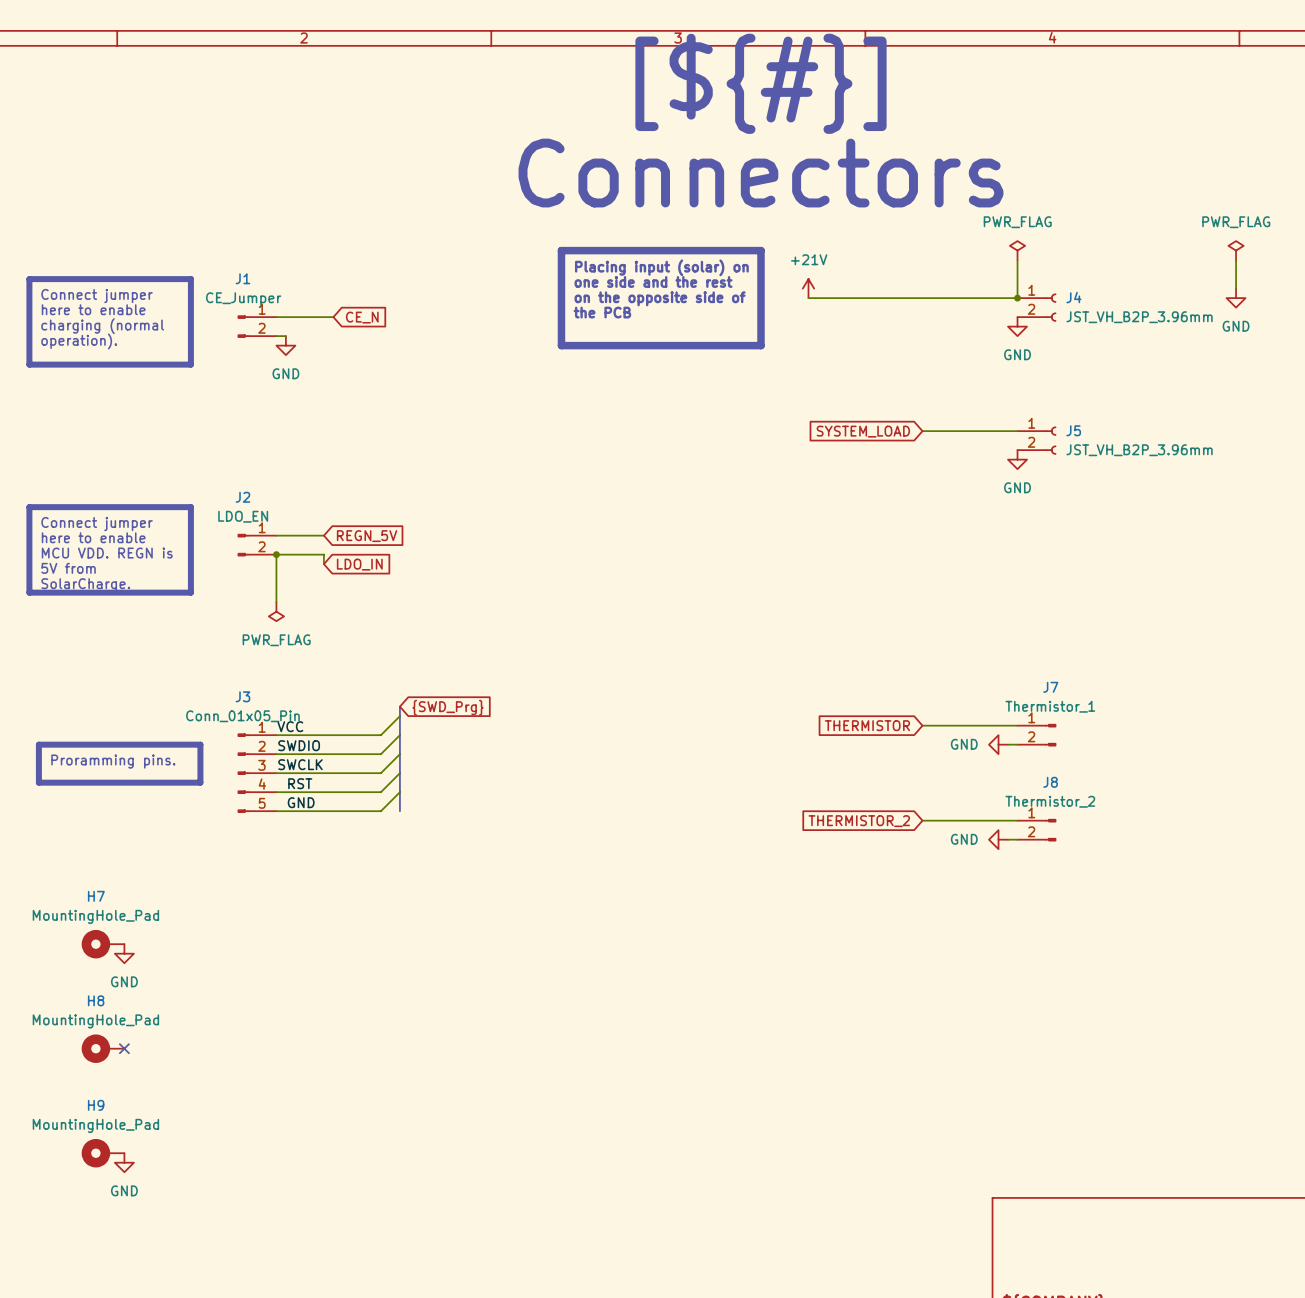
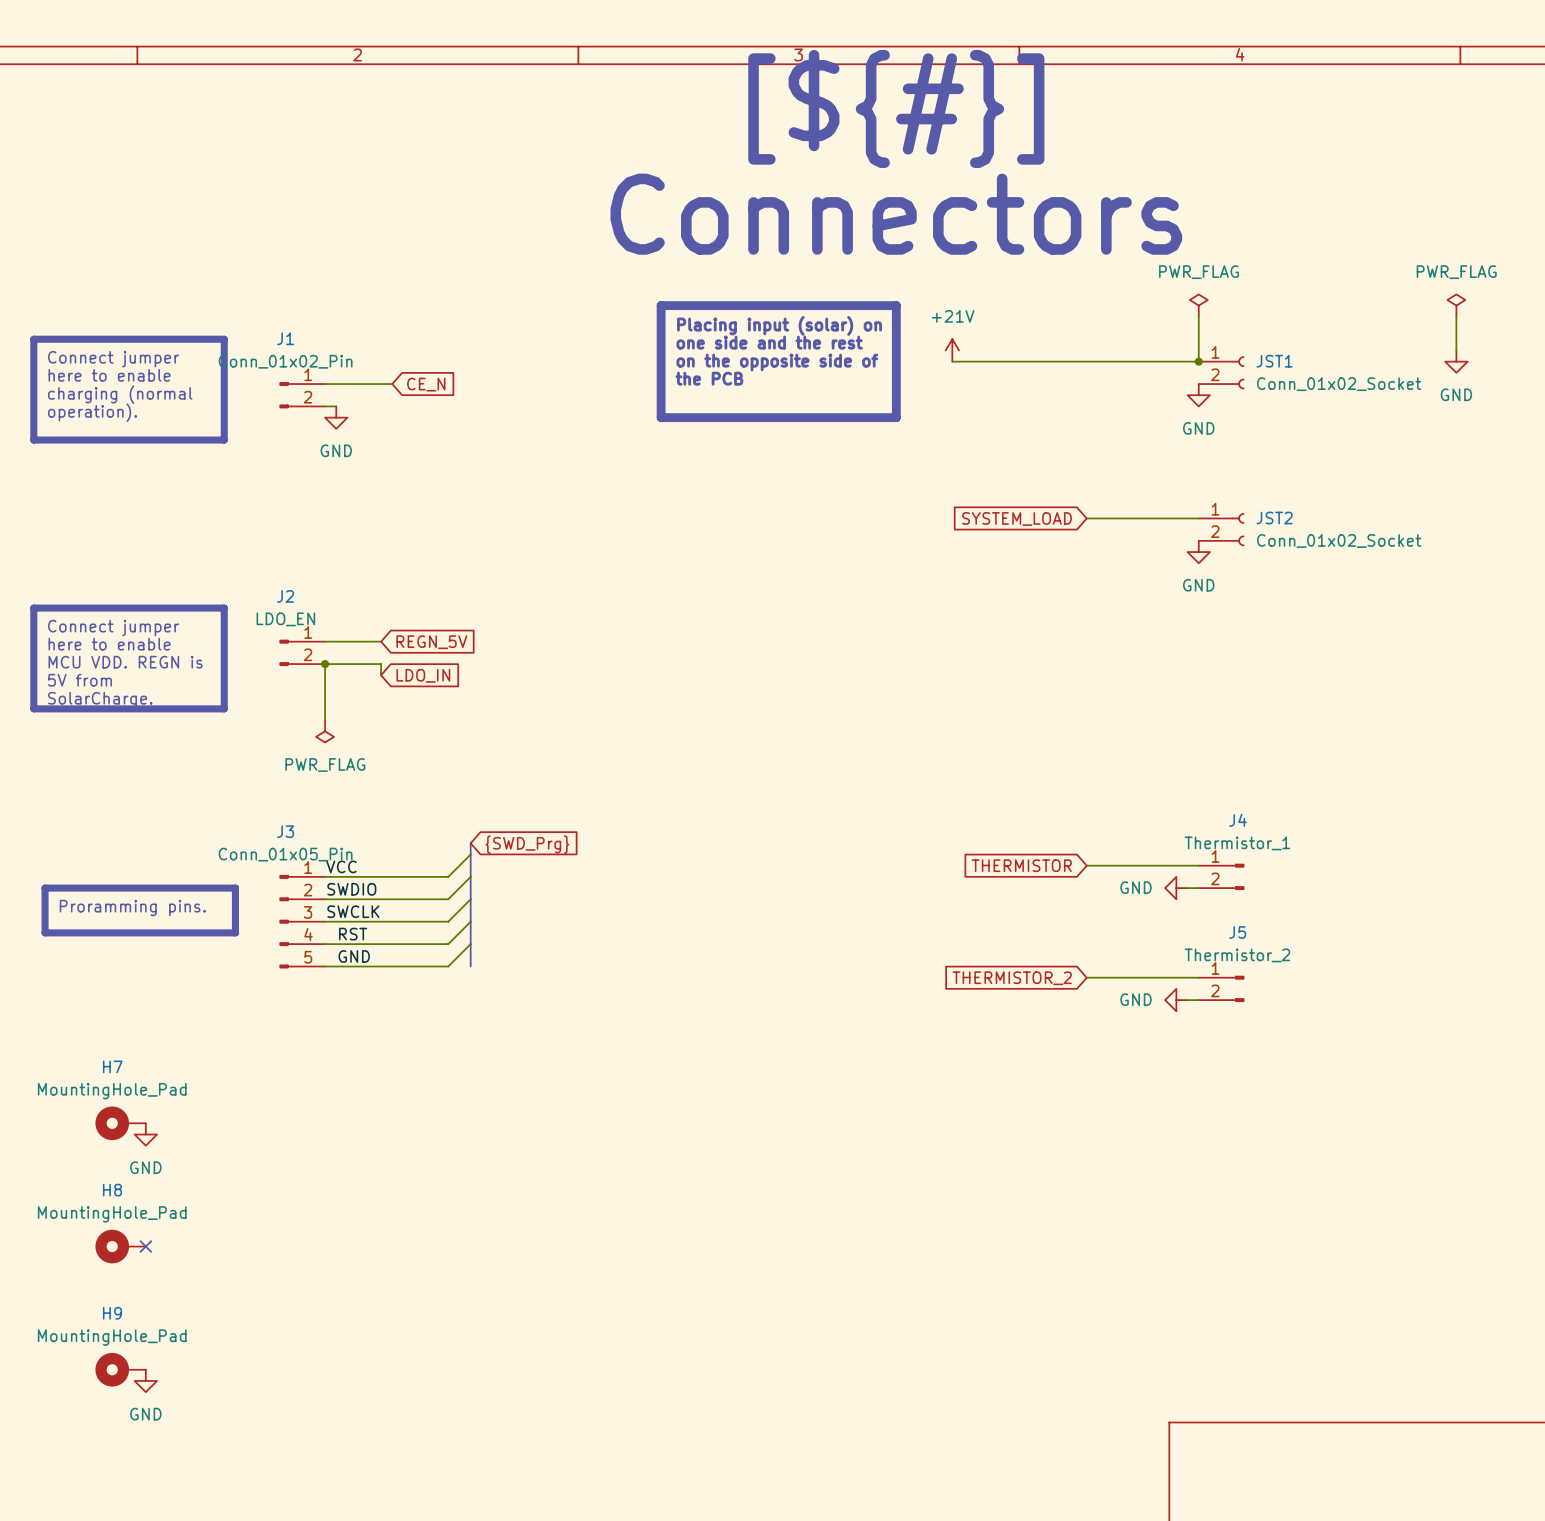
J4 name: J4 (1073, 297) -> JST1 (1274, 361)
J1 value: CE_Jumper (243, 299) -> Conn_01x02_Pin (285, 361)
J4 value: JST_VH_B2P_3.96mm (1139, 317) -> Conn_01x02_Socket (1339, 384)
J5 name: J5 (1073, 430) -> JST2 (1274, 518)
J5 value: JST_VH_B2P_3.96mm (1139, 450) -> Conn_01x02_Socket (1339, 540)
J7 name: J7 (1050, 687) -> J4 (1237, 820)
J8 name: J8 (1050, 782) -> J5 (1237, 932)

